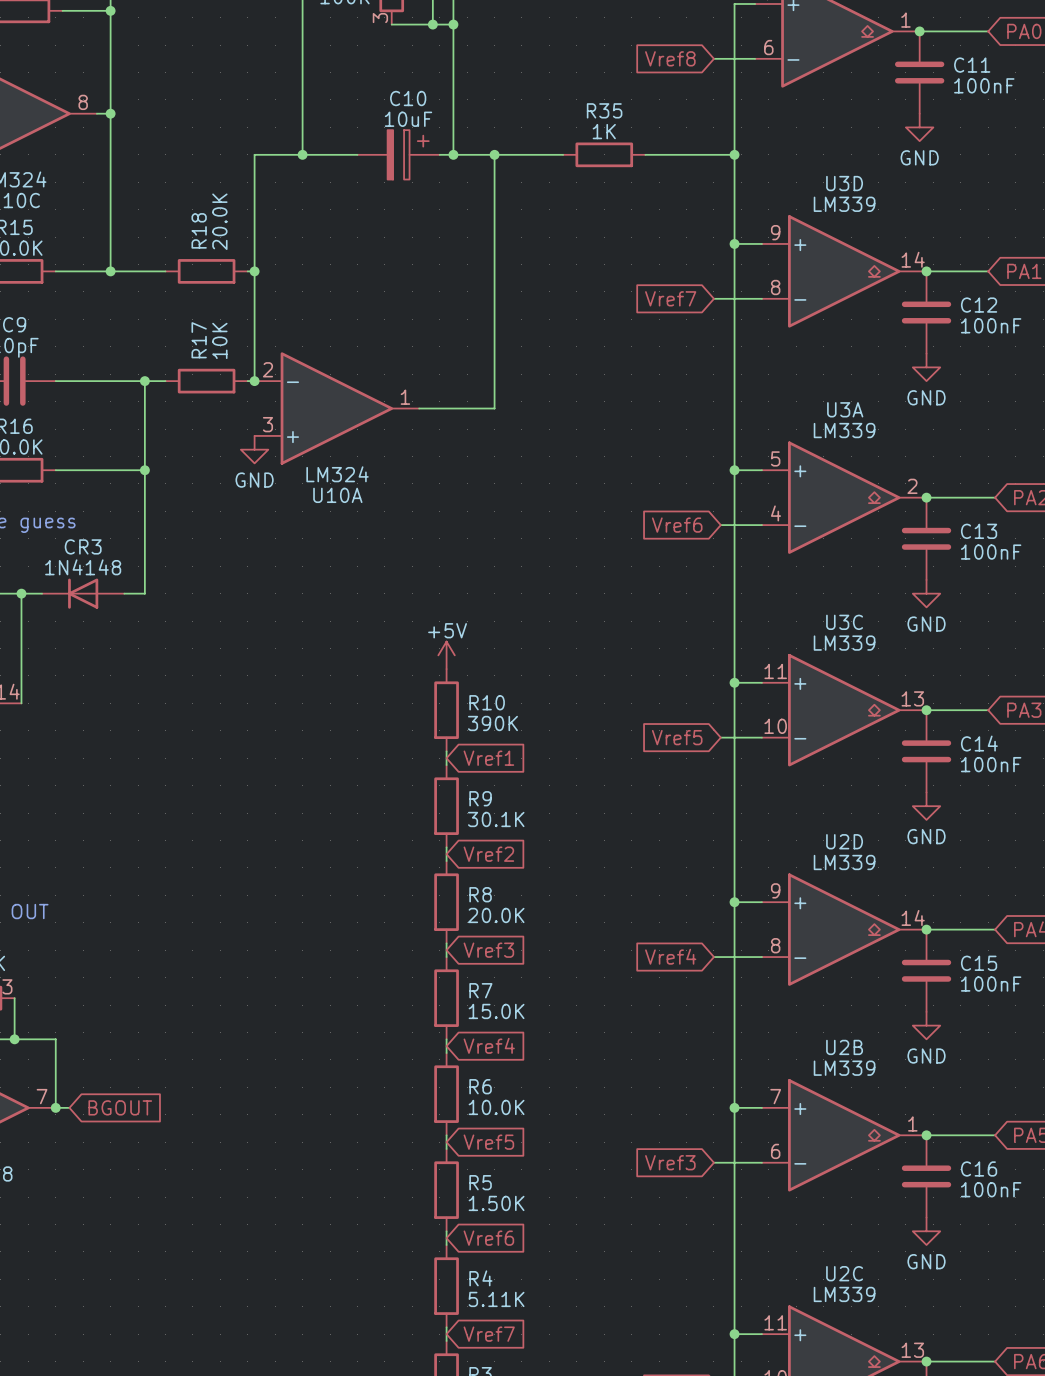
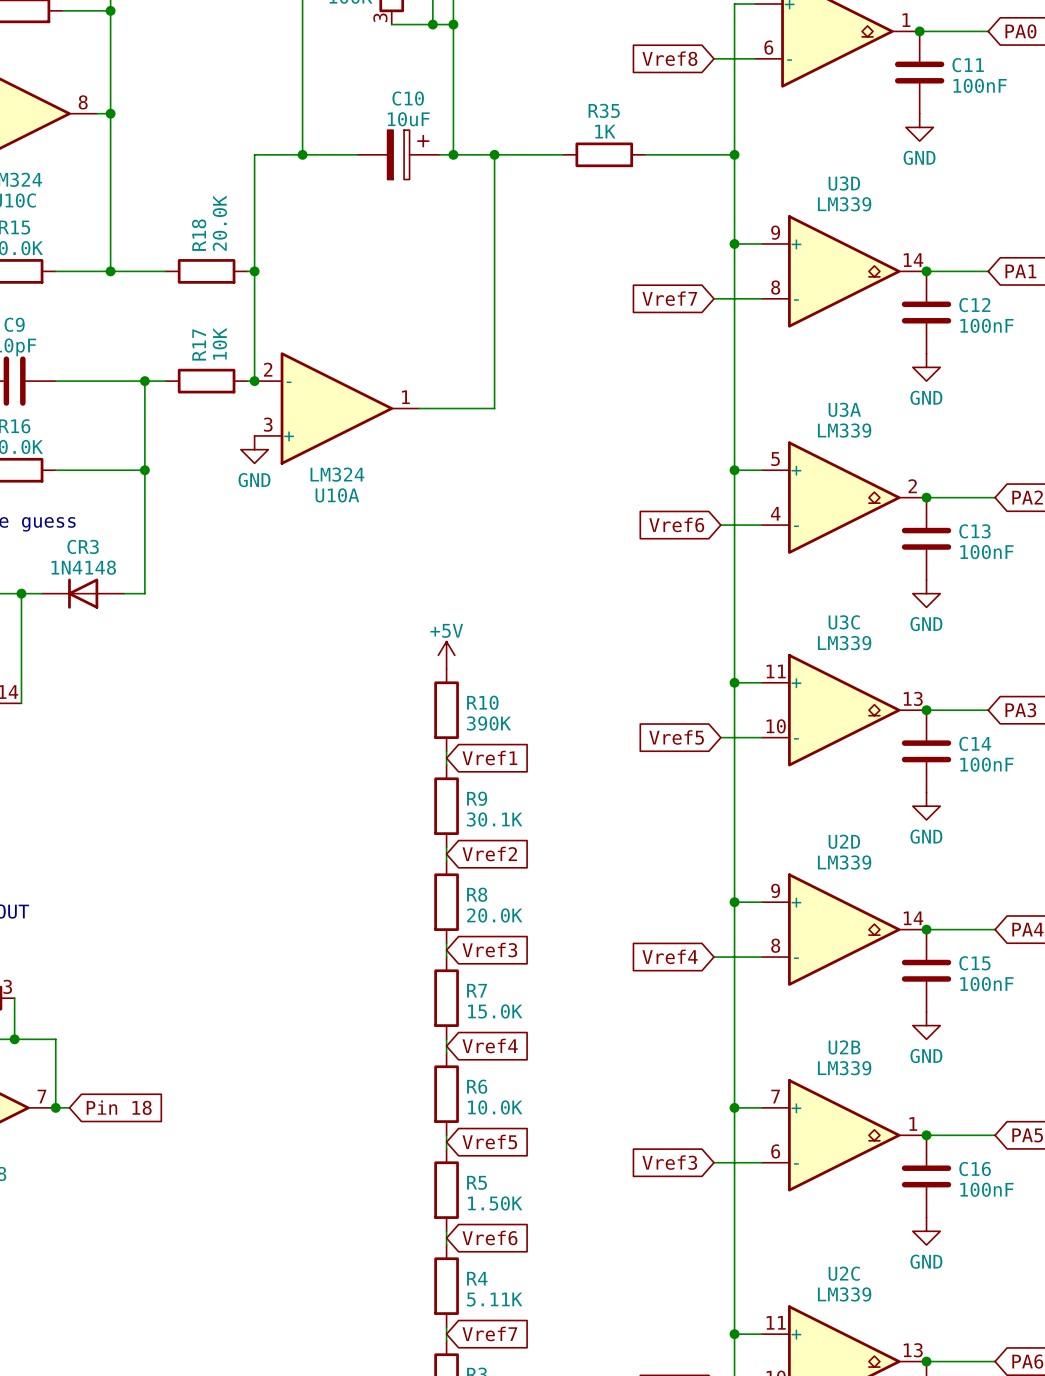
global label: BGOUT (120, 1107) -> Pin 18 (119, 1107)

